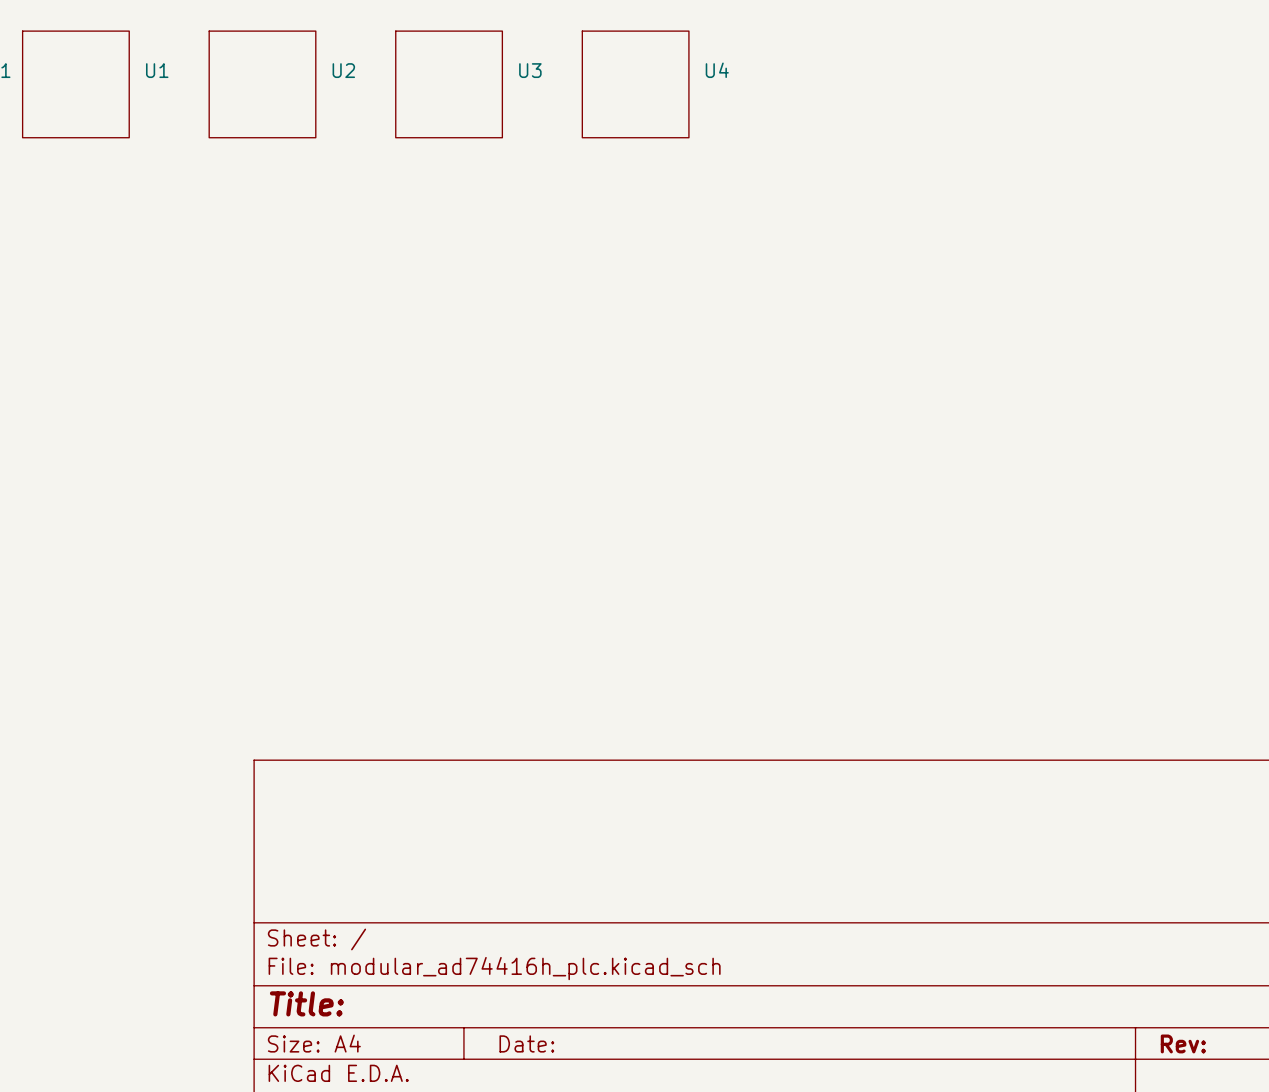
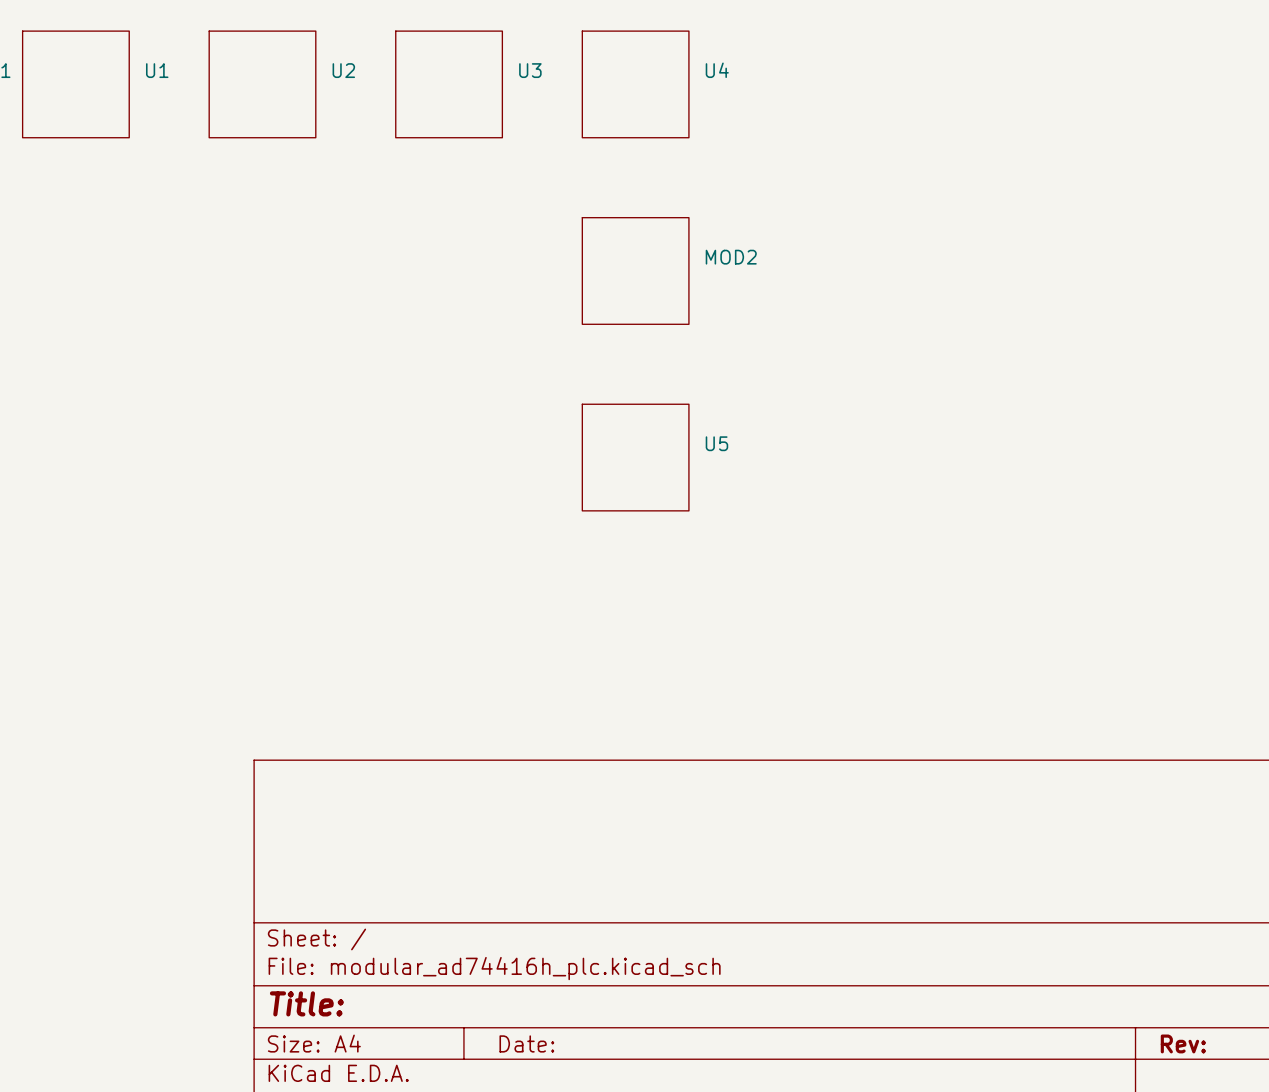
MOD2: none -> (635, 270)
U5: none -> (635, 457)

